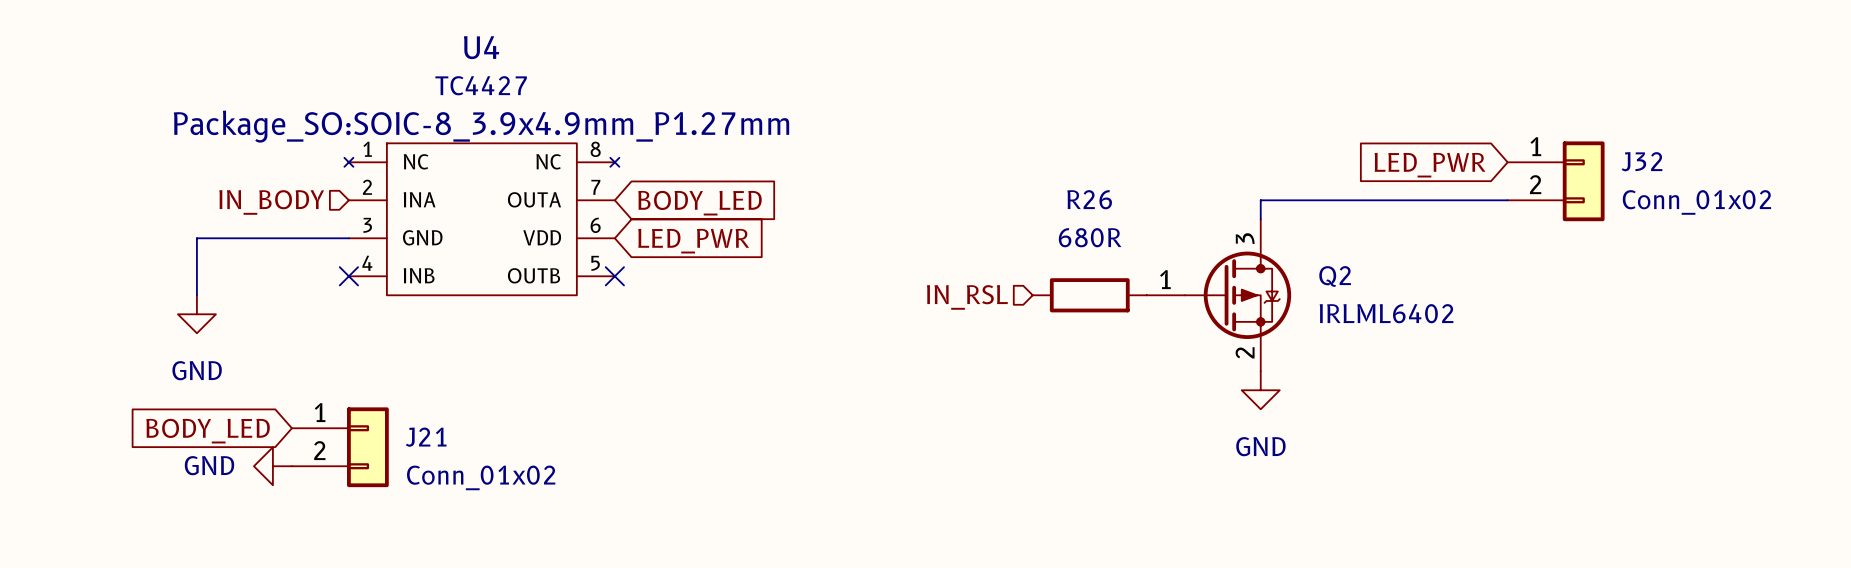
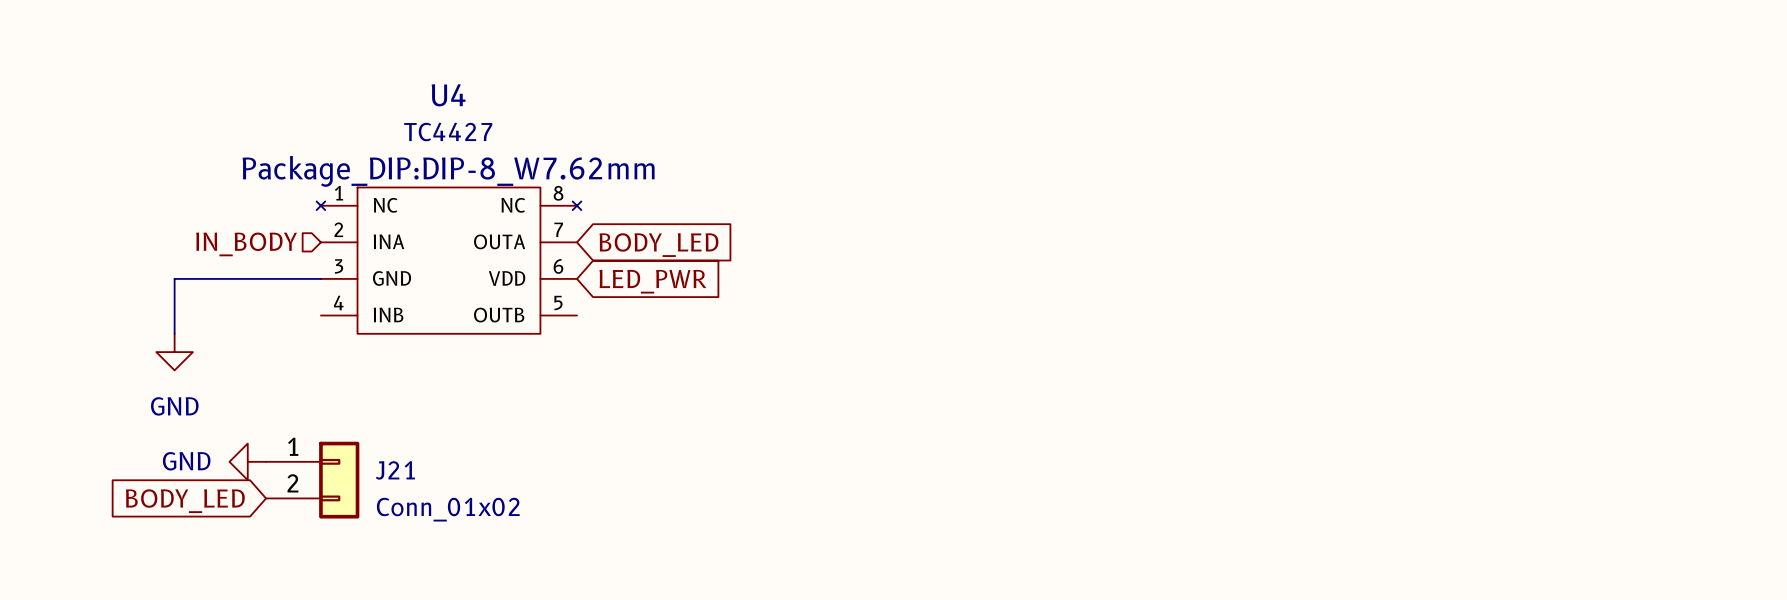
U4 text: Package_SO:SOIC-8_3.9x4.9mm_P1.27mm (481, 126) -> Package_DIP:DIP-8_W7.62mm (448, 171)
global label: LED_PWR (1430, 165) -> none
J32: Conn_01x02 (1556, 181) -> none
wire: (1507, 200) (1260, 200) (1260, 219) -> none
no-connect mark: (348, 276) -> none
no-connect mark: (614, 276) -> none
R26: 680R (1089, 295) -> none
Q2: IRLML6402 (1218, 295) -> none
hierarchical label: IN_RSL (967, 297) -> none
power symbol: GND (1260, 390) -> none
global label position: BODY_LED (208, 431) -> BODY_LED (185, 501)
power symbol position: GND (272, 466) -> GND (247, 461)

